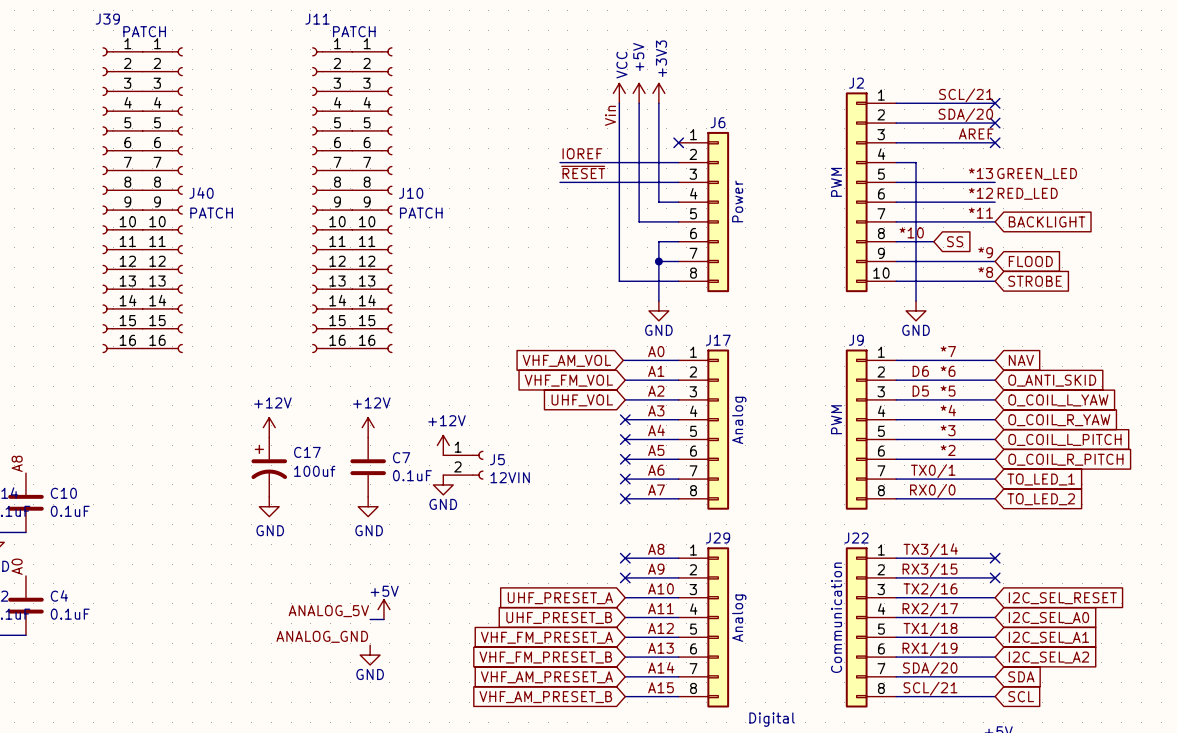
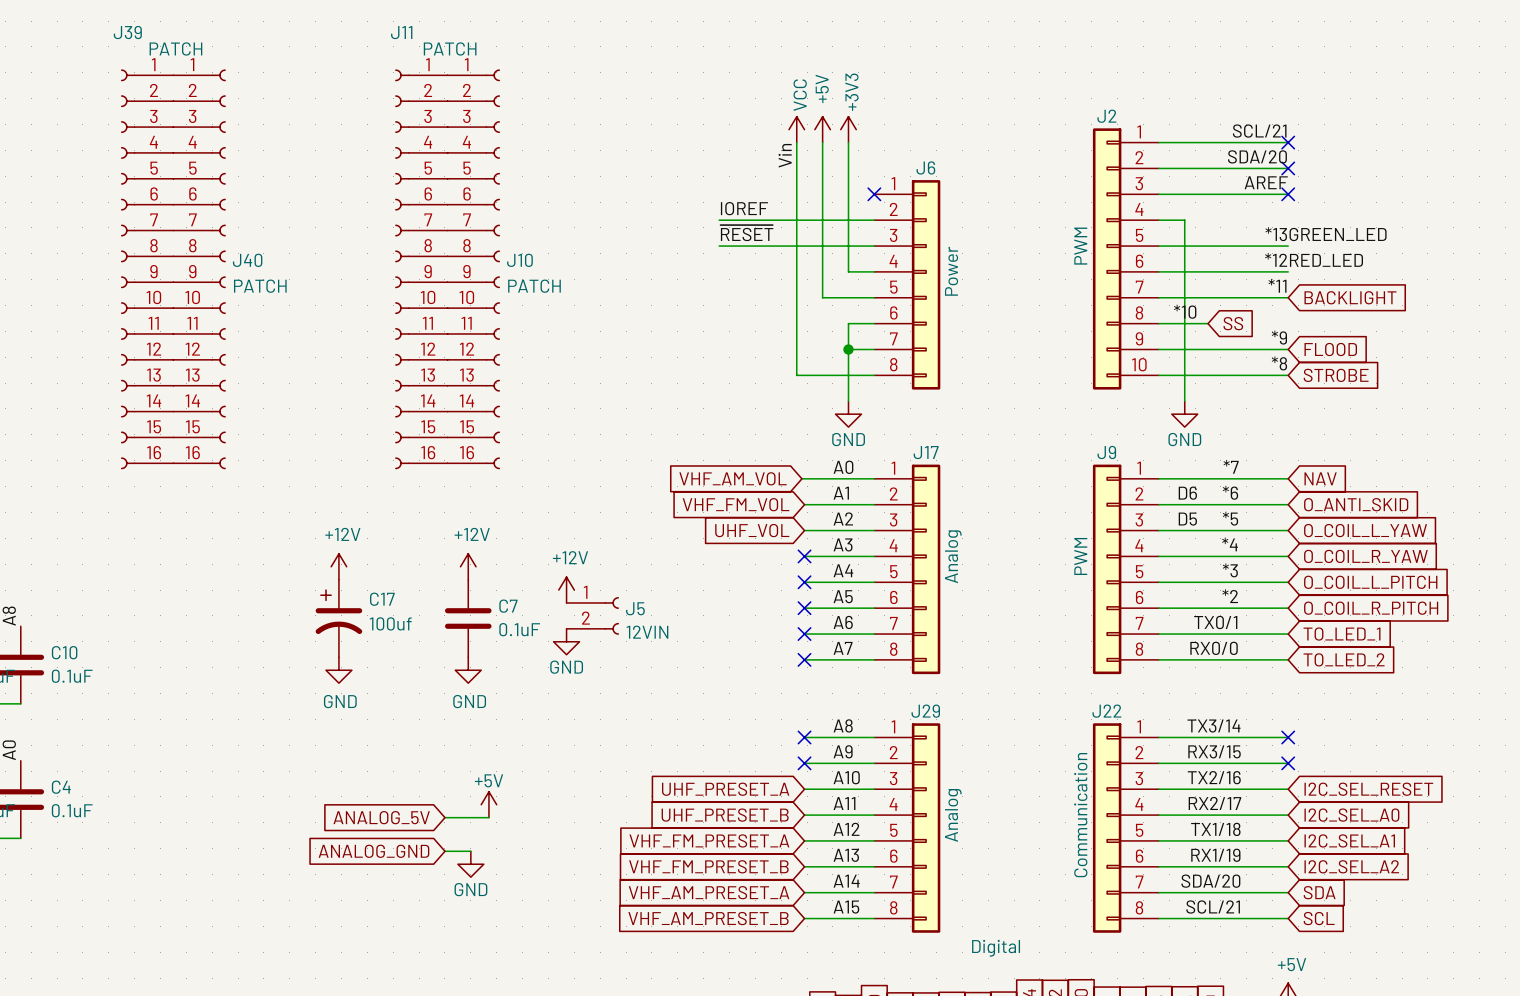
label: ANALOG_5V (328, 611) -> none
global label: none -> ANALOG_5V (381, 817)
wire: none -> (444, 817) (470, 817)
label: ANALOG_GND (322, 636) -> none
global label: none -> ANALOG_GND (373, 851)
wire: none -> (444, 851) (470, 851)

